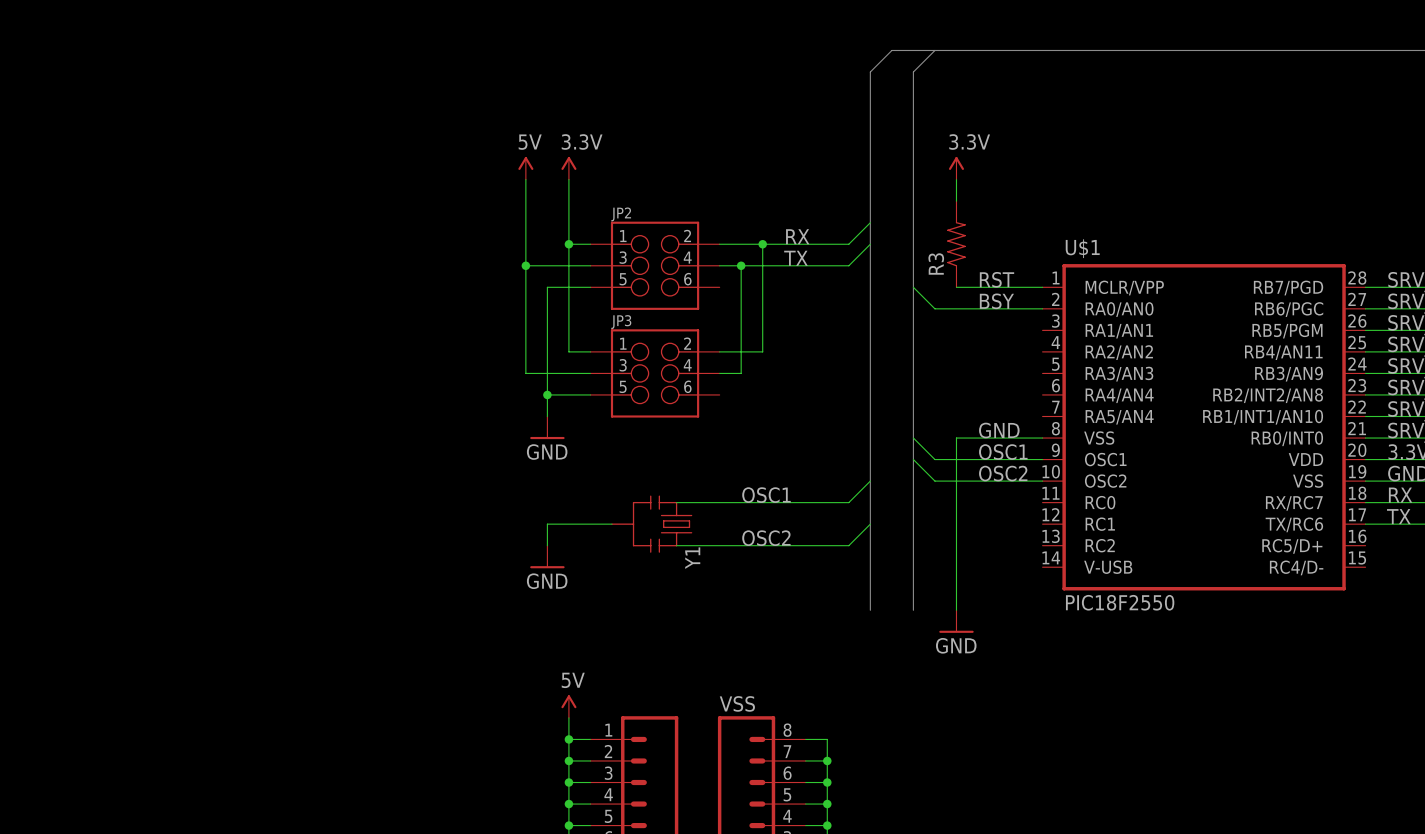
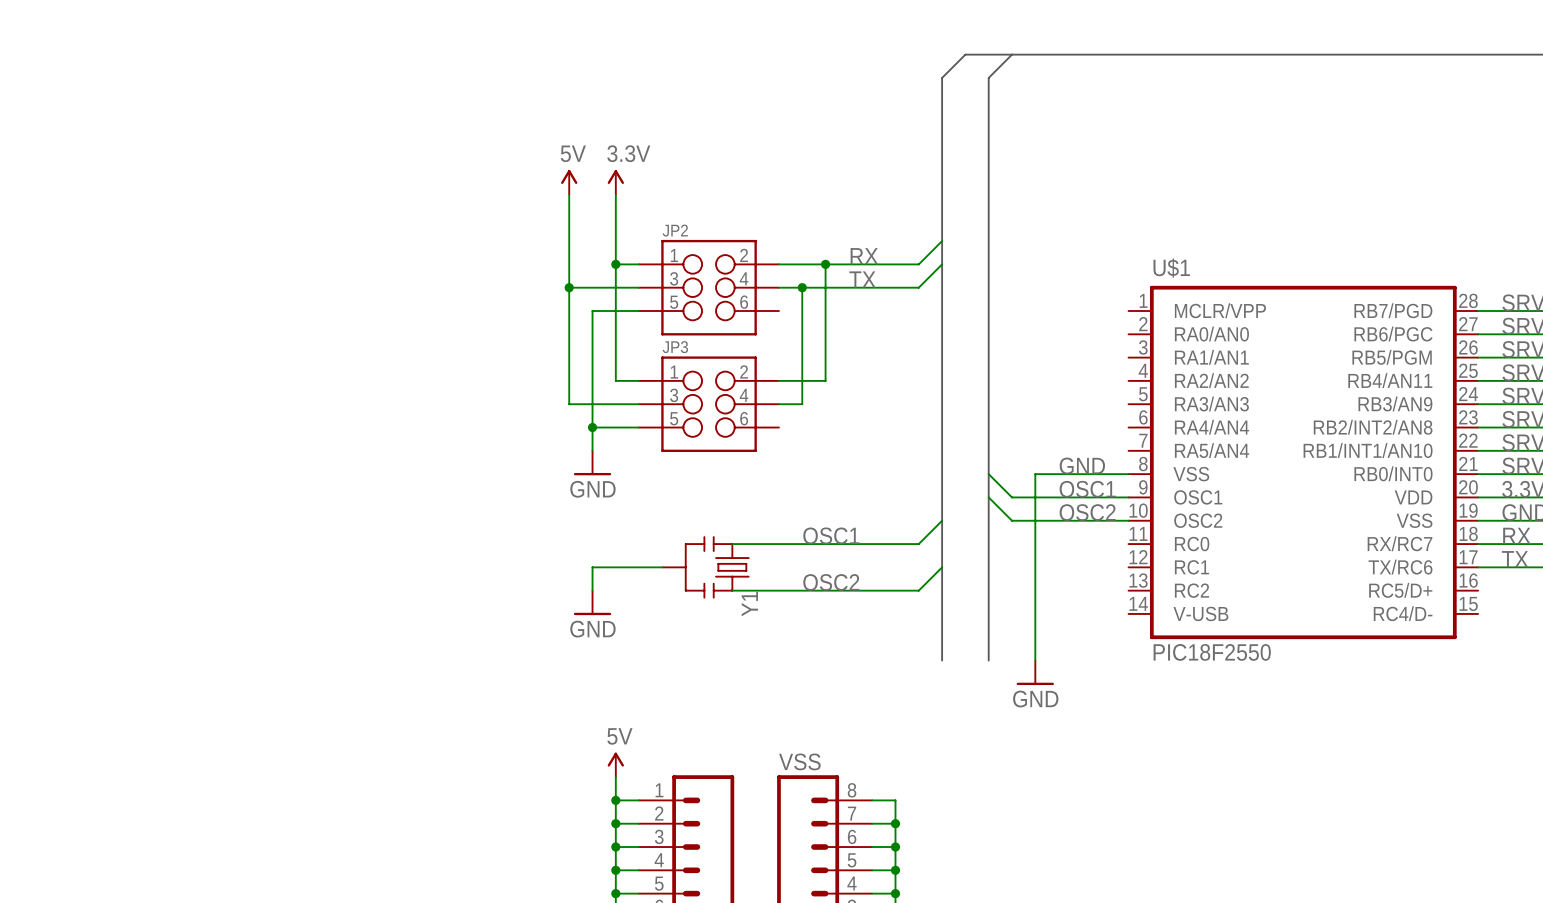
power symbol: 3.3V (956, 168) -> none
wire: (956, 179) (956, 201) -> none
R3: (956, 244) -> none
label: RST (996, 279) -> none
wire: (913, 287) (934, 308) (1042, 308) -> none
wire: (956, 287) (1042, 287) -> none
label: BSY (996, 301) -> none

